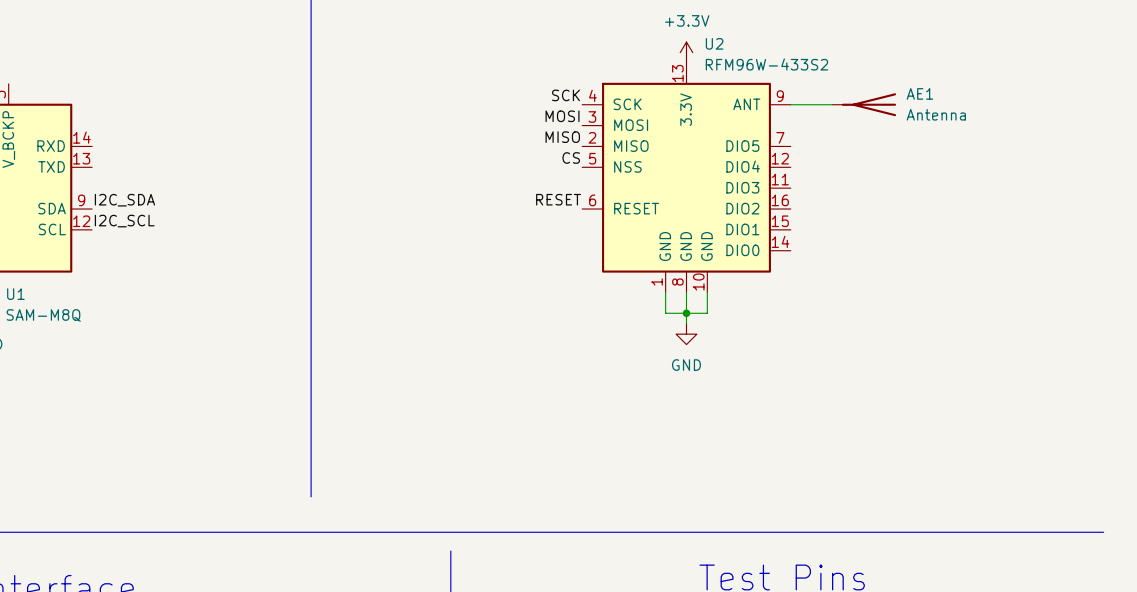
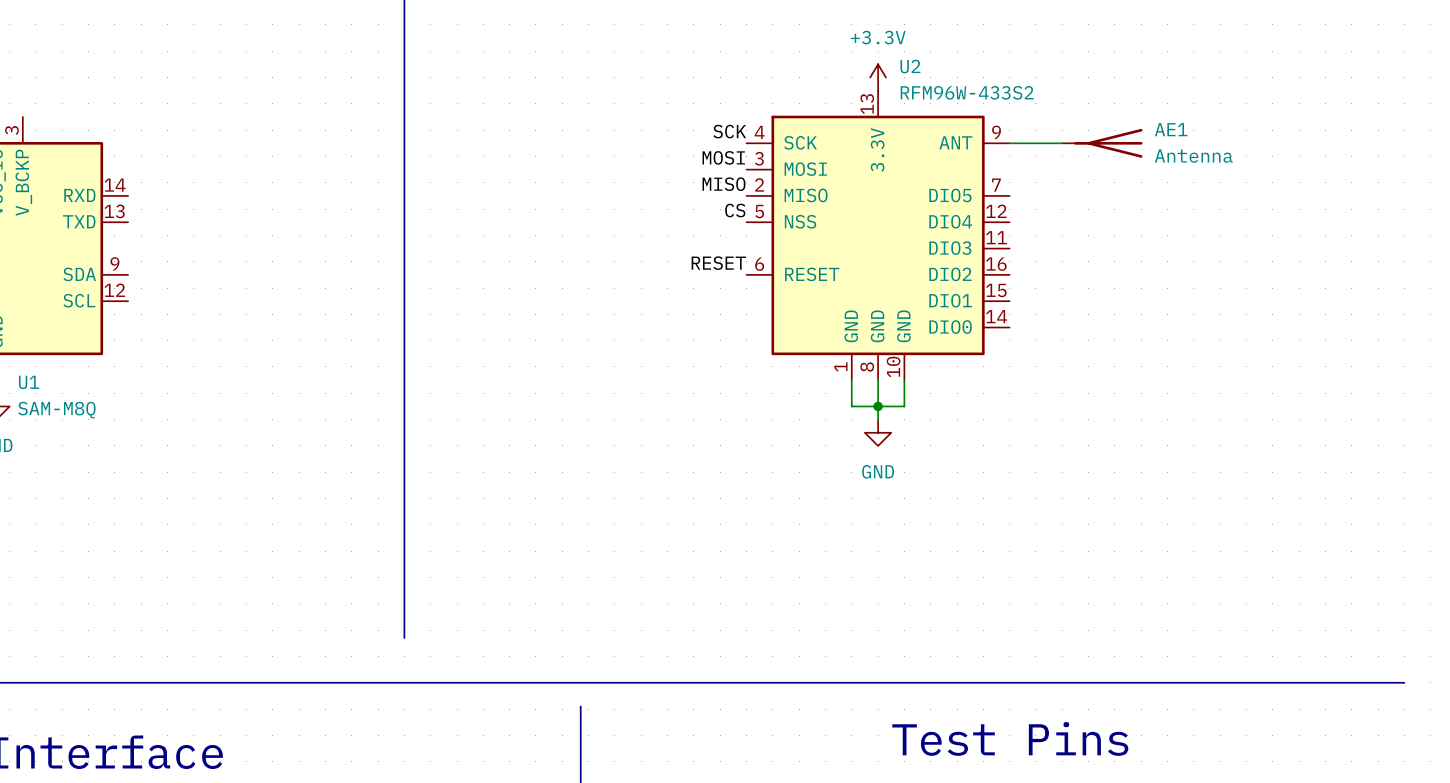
label: I2C_SDA (124, 200) -> none
label: I2C_SCL (124, 221) -> none

